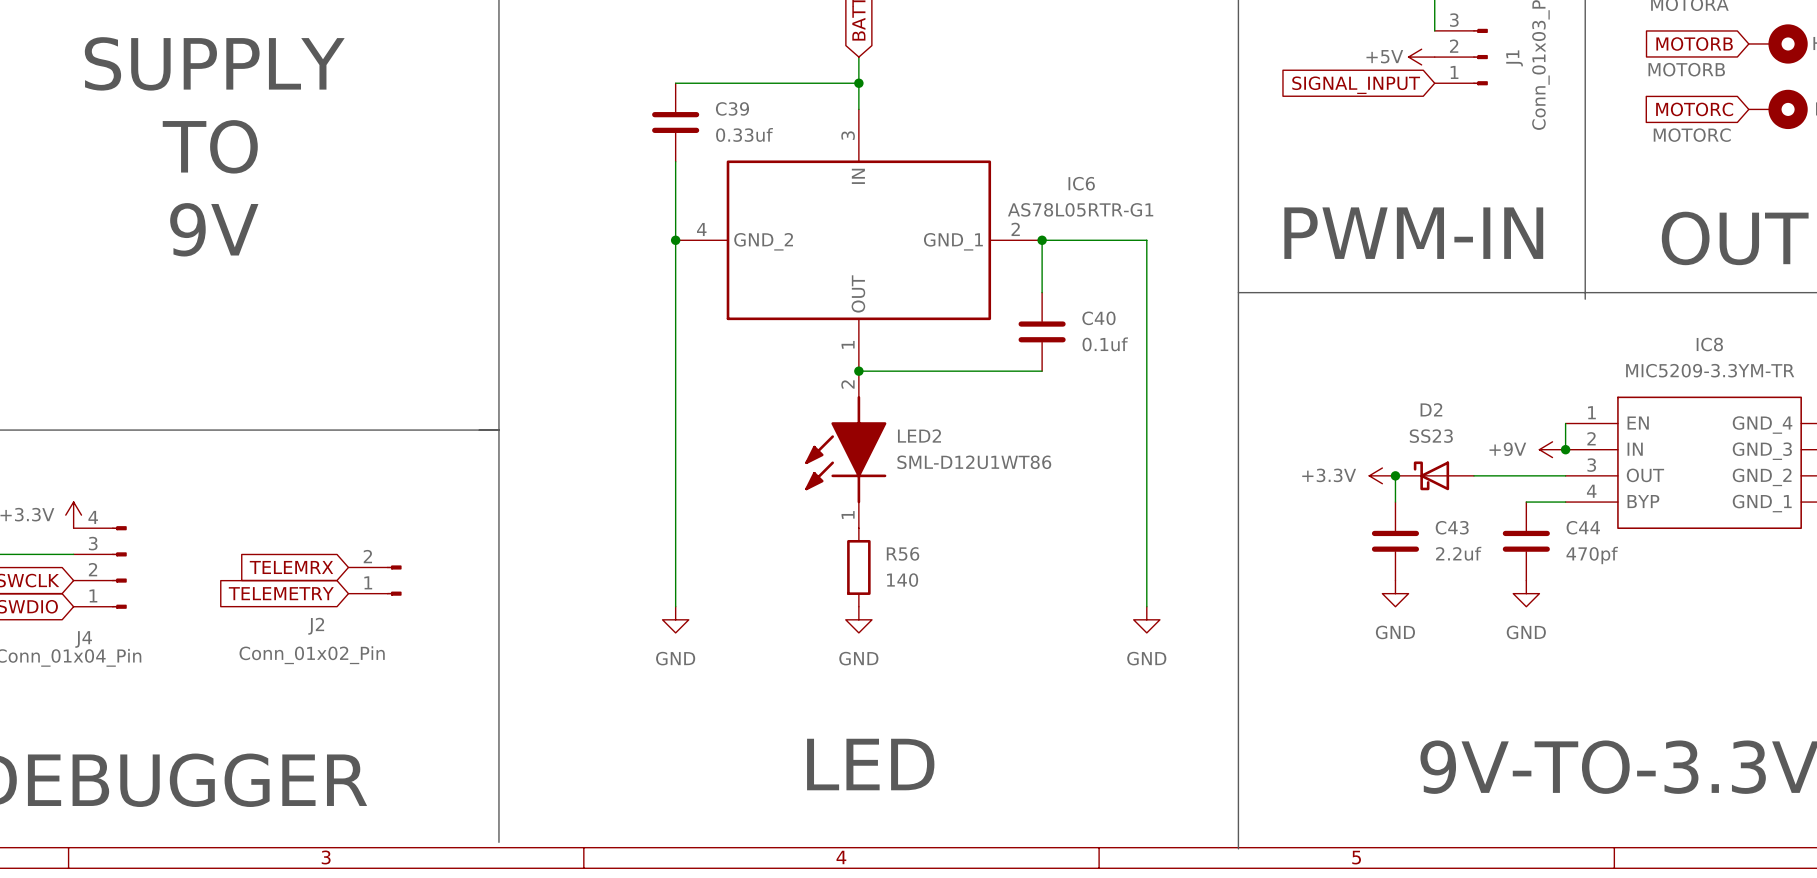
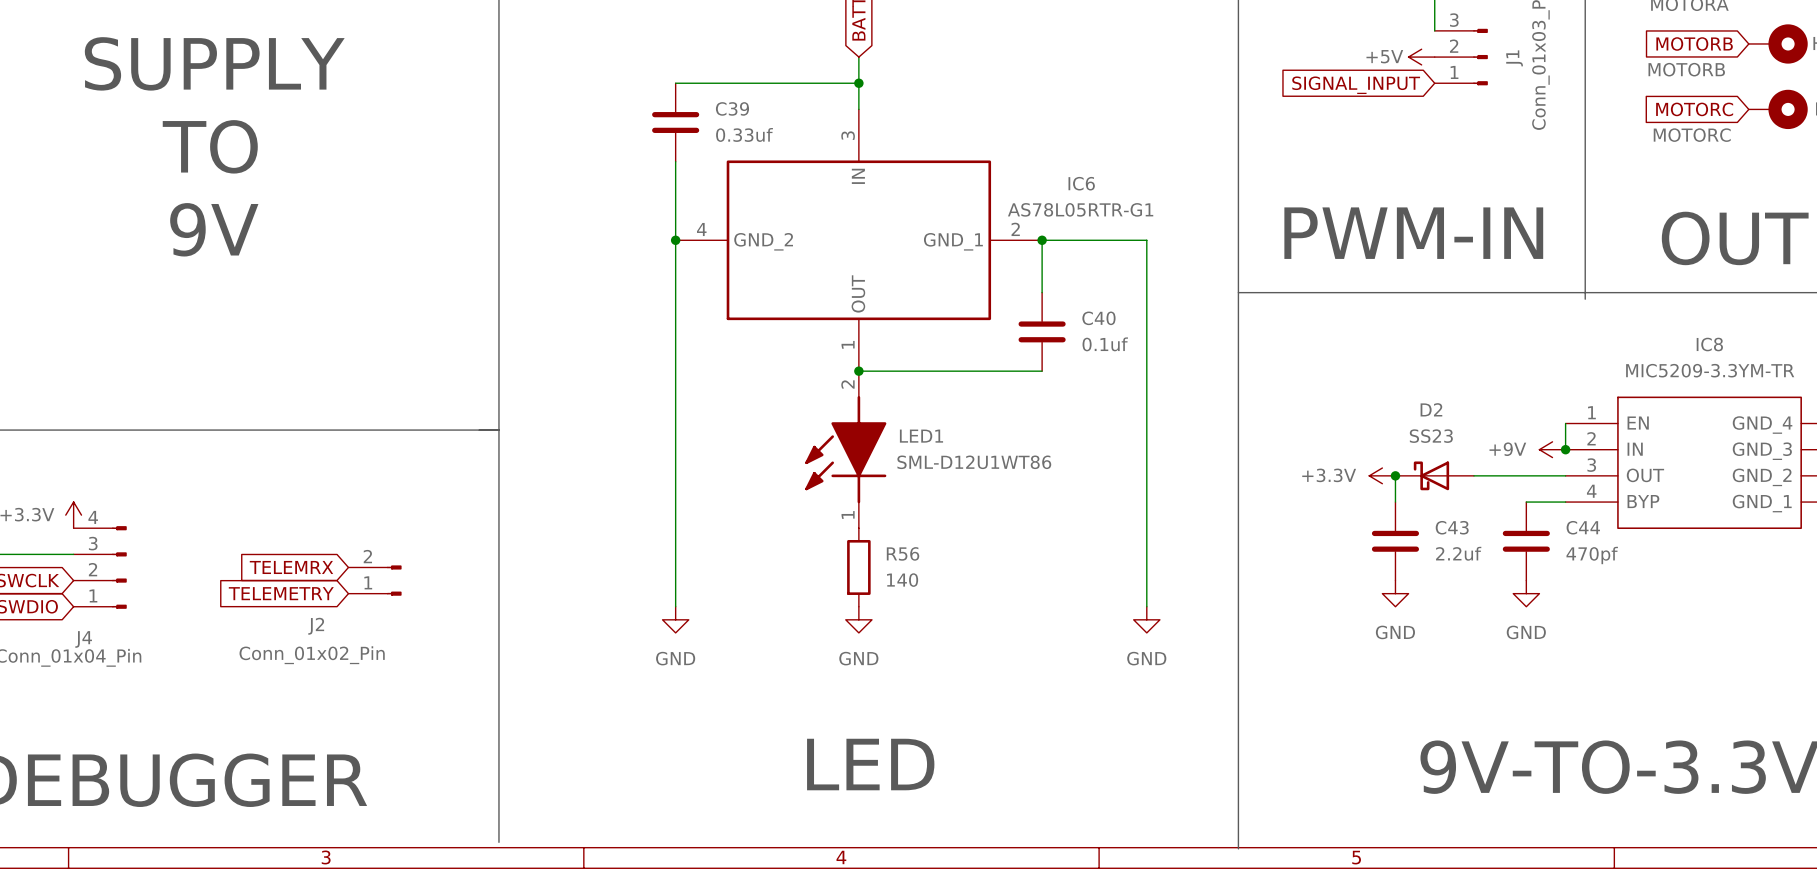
LED2 name: LED2 (919, 435) -> LED1 (921, 436)

